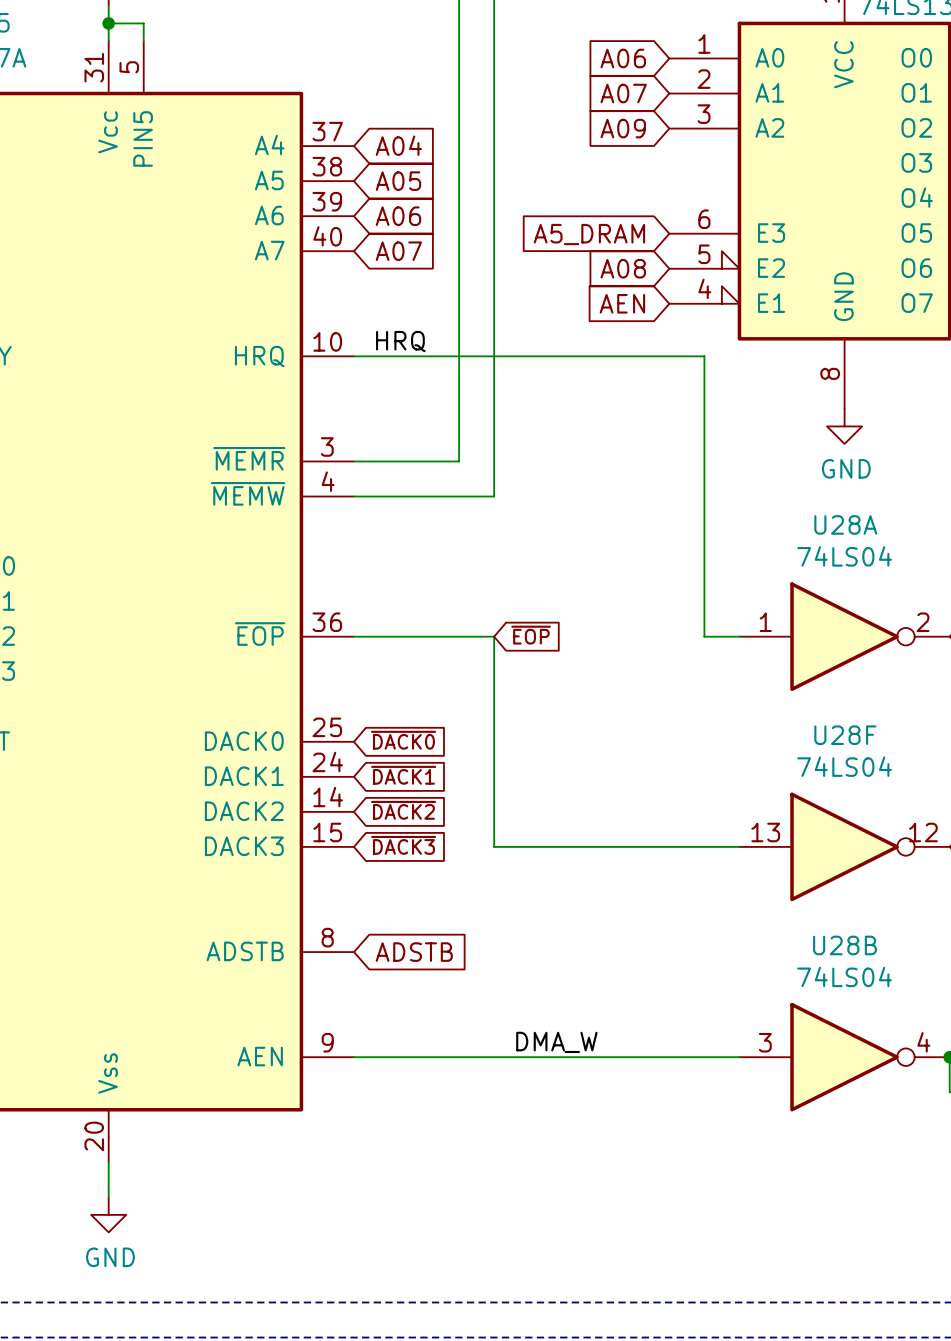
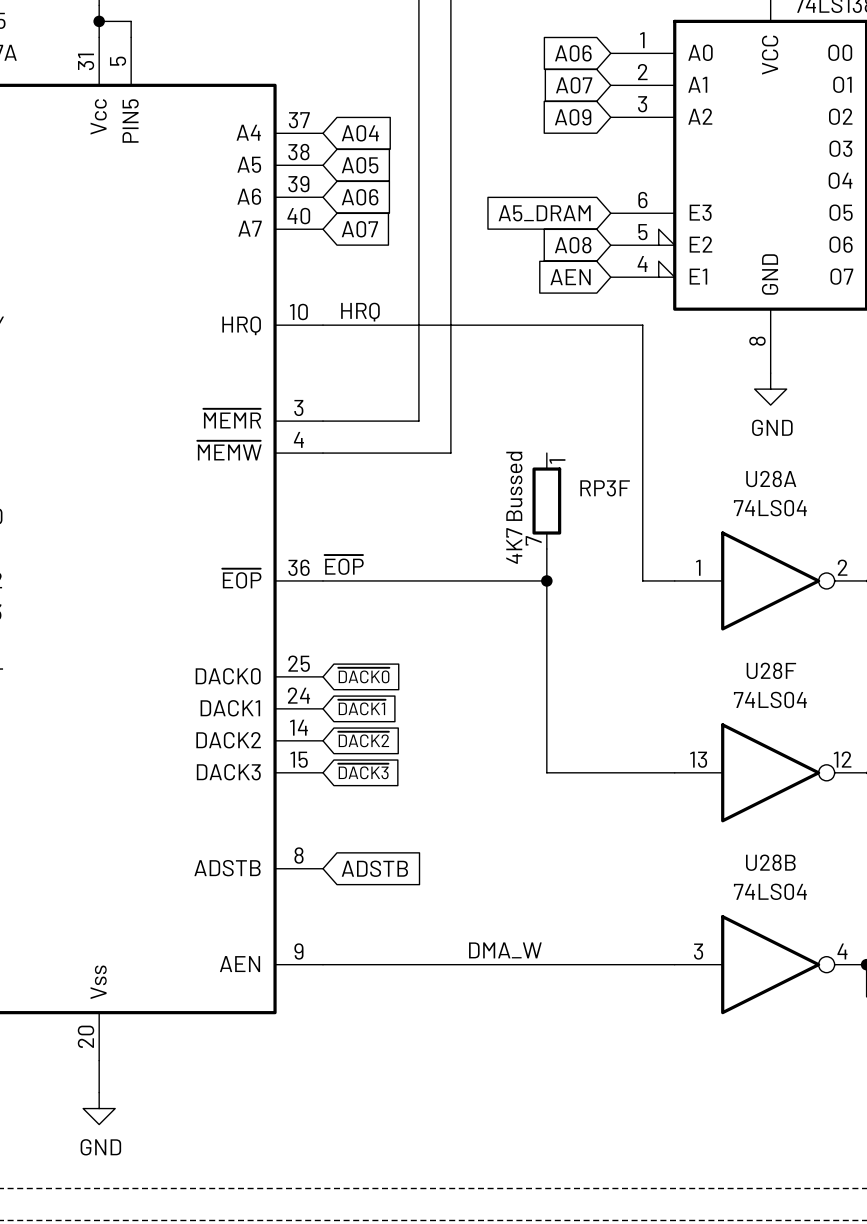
RP3F: none -> 4K7 Bussed (546, 501)
label: none -> ~{EOP} (344, 564)
global label: ~{EOP} (531, 635) -> none
wire: (494, 636) (494, 846) (599, 846) -> (546, 548) (546, 772)
wire: none -> (450, 580) (546, 580)
junction: none -> (546, 580)

